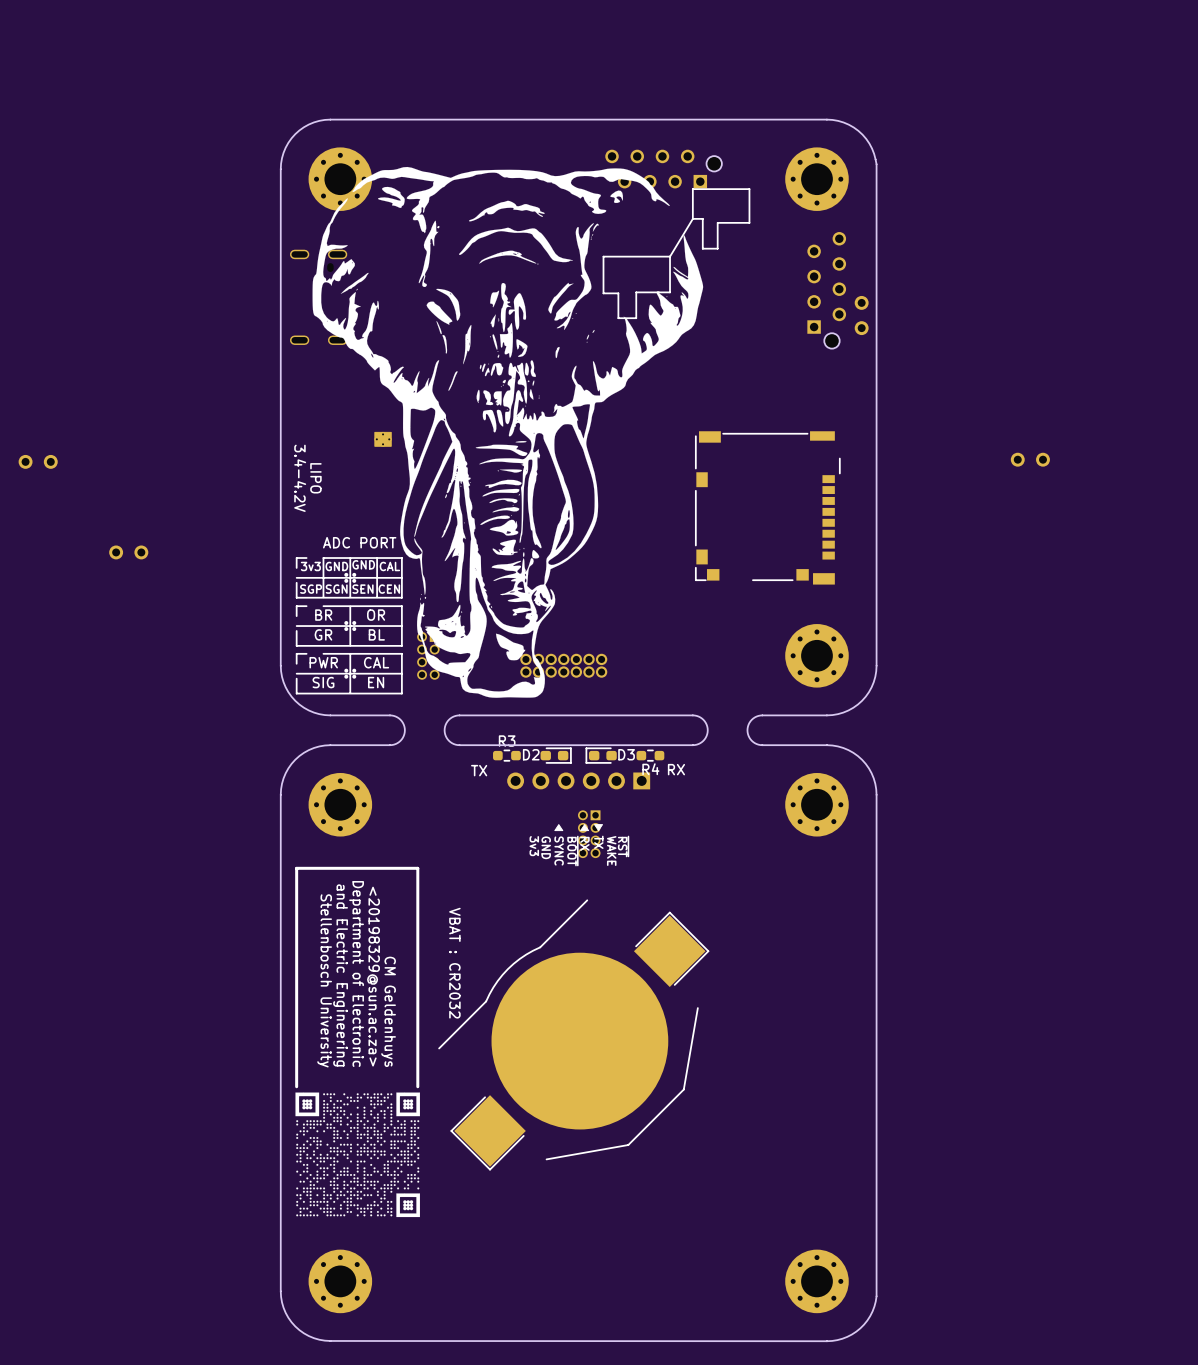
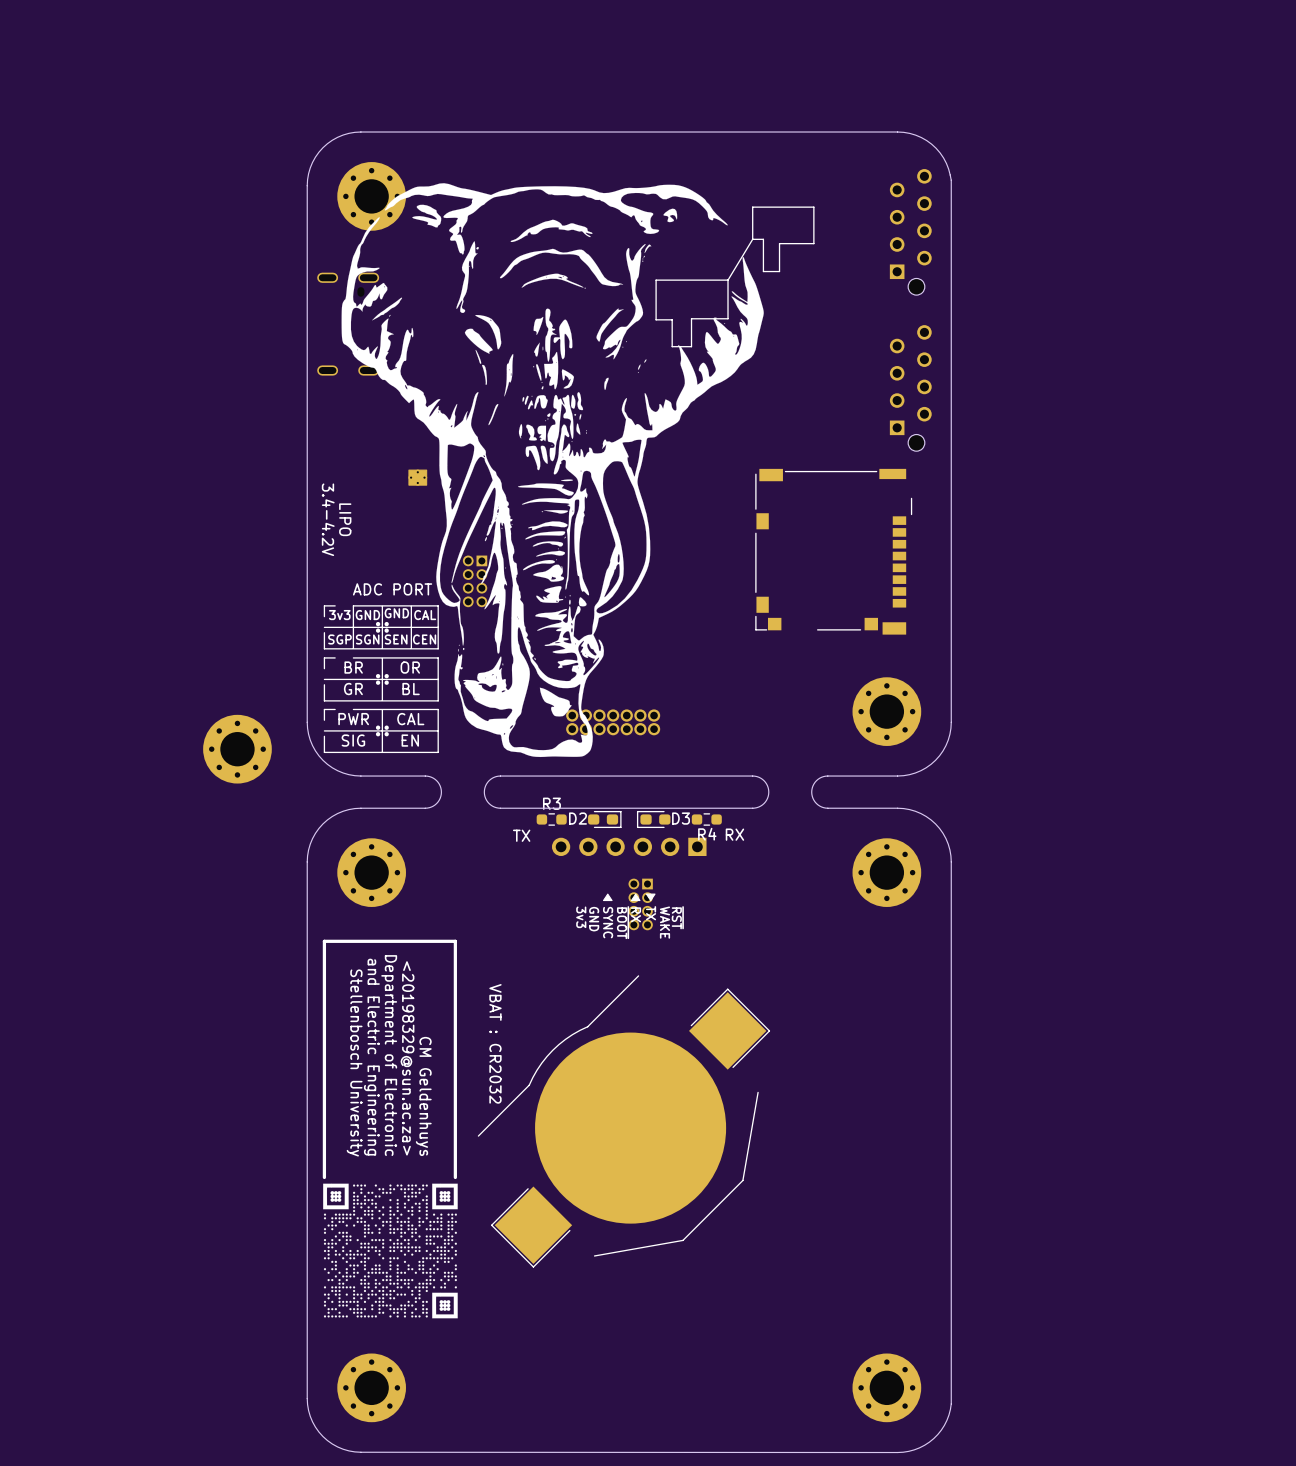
part: (663, 169) -> none
part: (816, 179) -> none
part: none -> (910, 232)
part: (826, 290) -> none
part: (861, 315) -> none
part: none -> (910, 388)
part: (1030, 459) -> none
part: (38, 461) -> none
part: (128, 552) -> none
part position: (428, 655) -> (475, 581)
part: none -> (237, 749)

